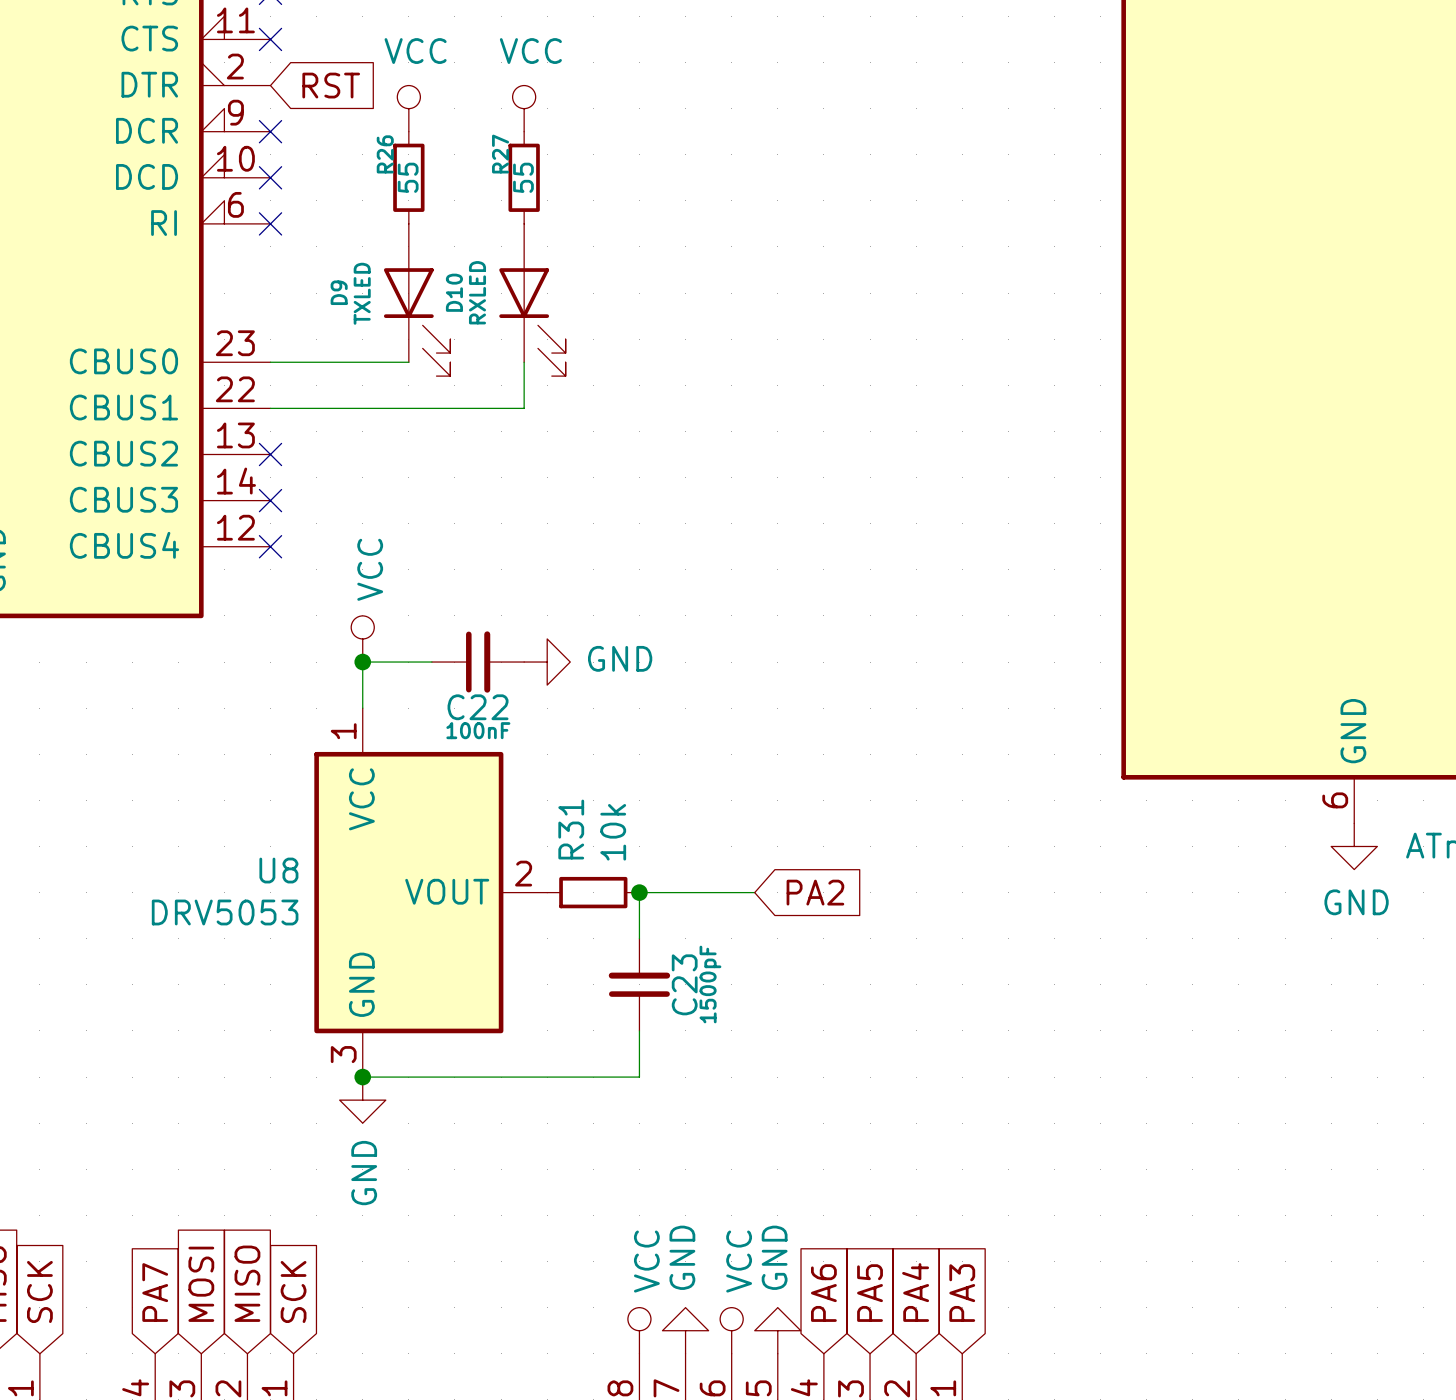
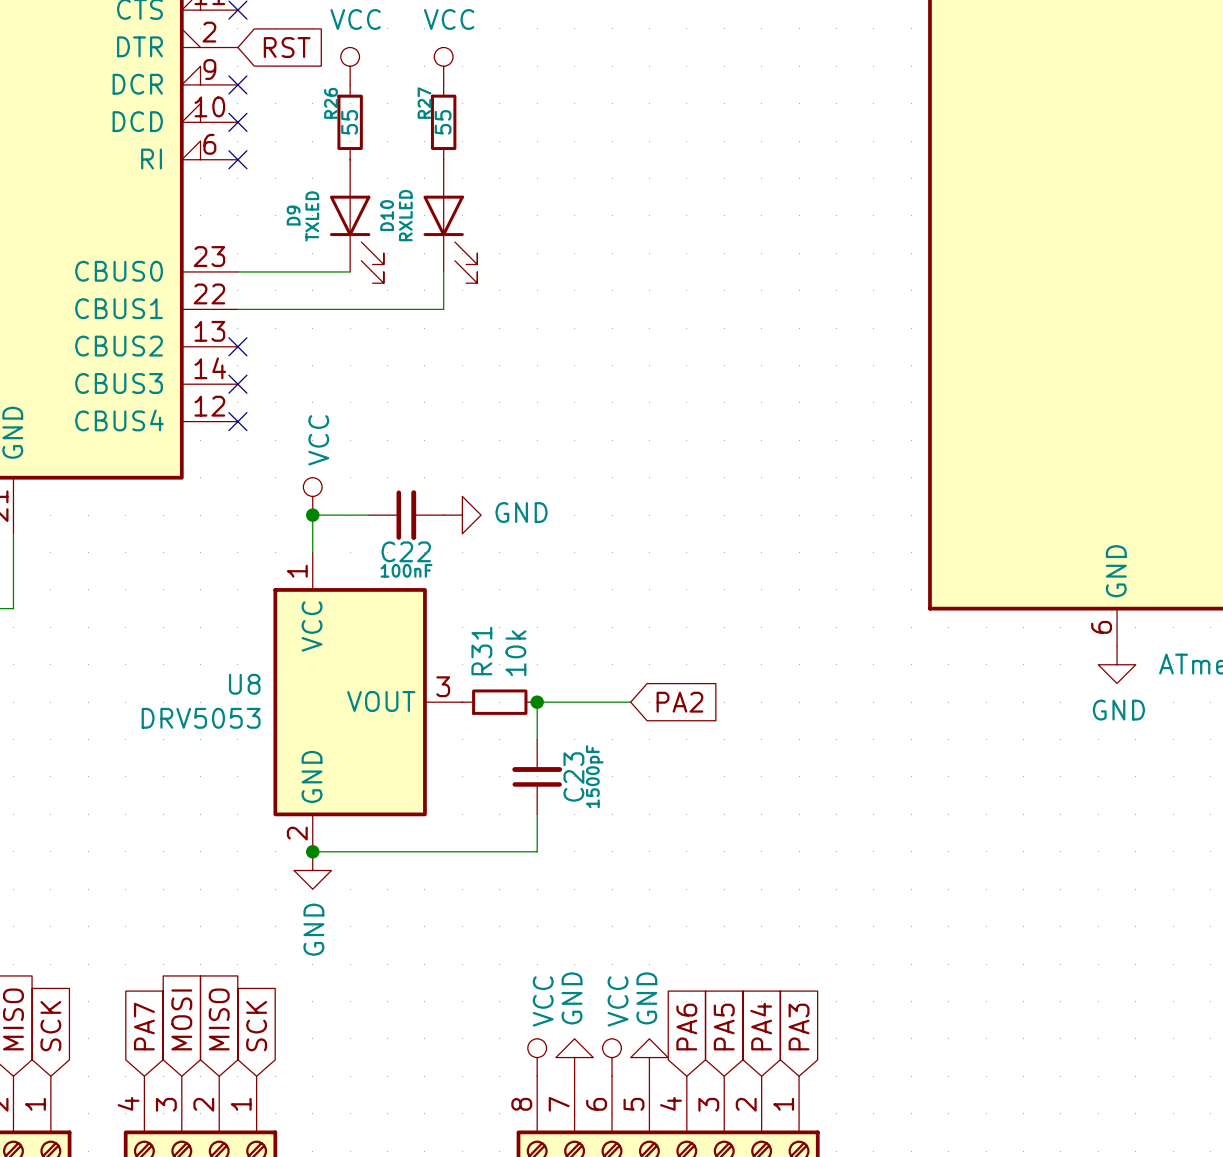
U8 pin number: 2 (523, 873) -> 3 (443, 686)
U8 pin number: 3 (343, 1054) -> 2 (297, 833)

